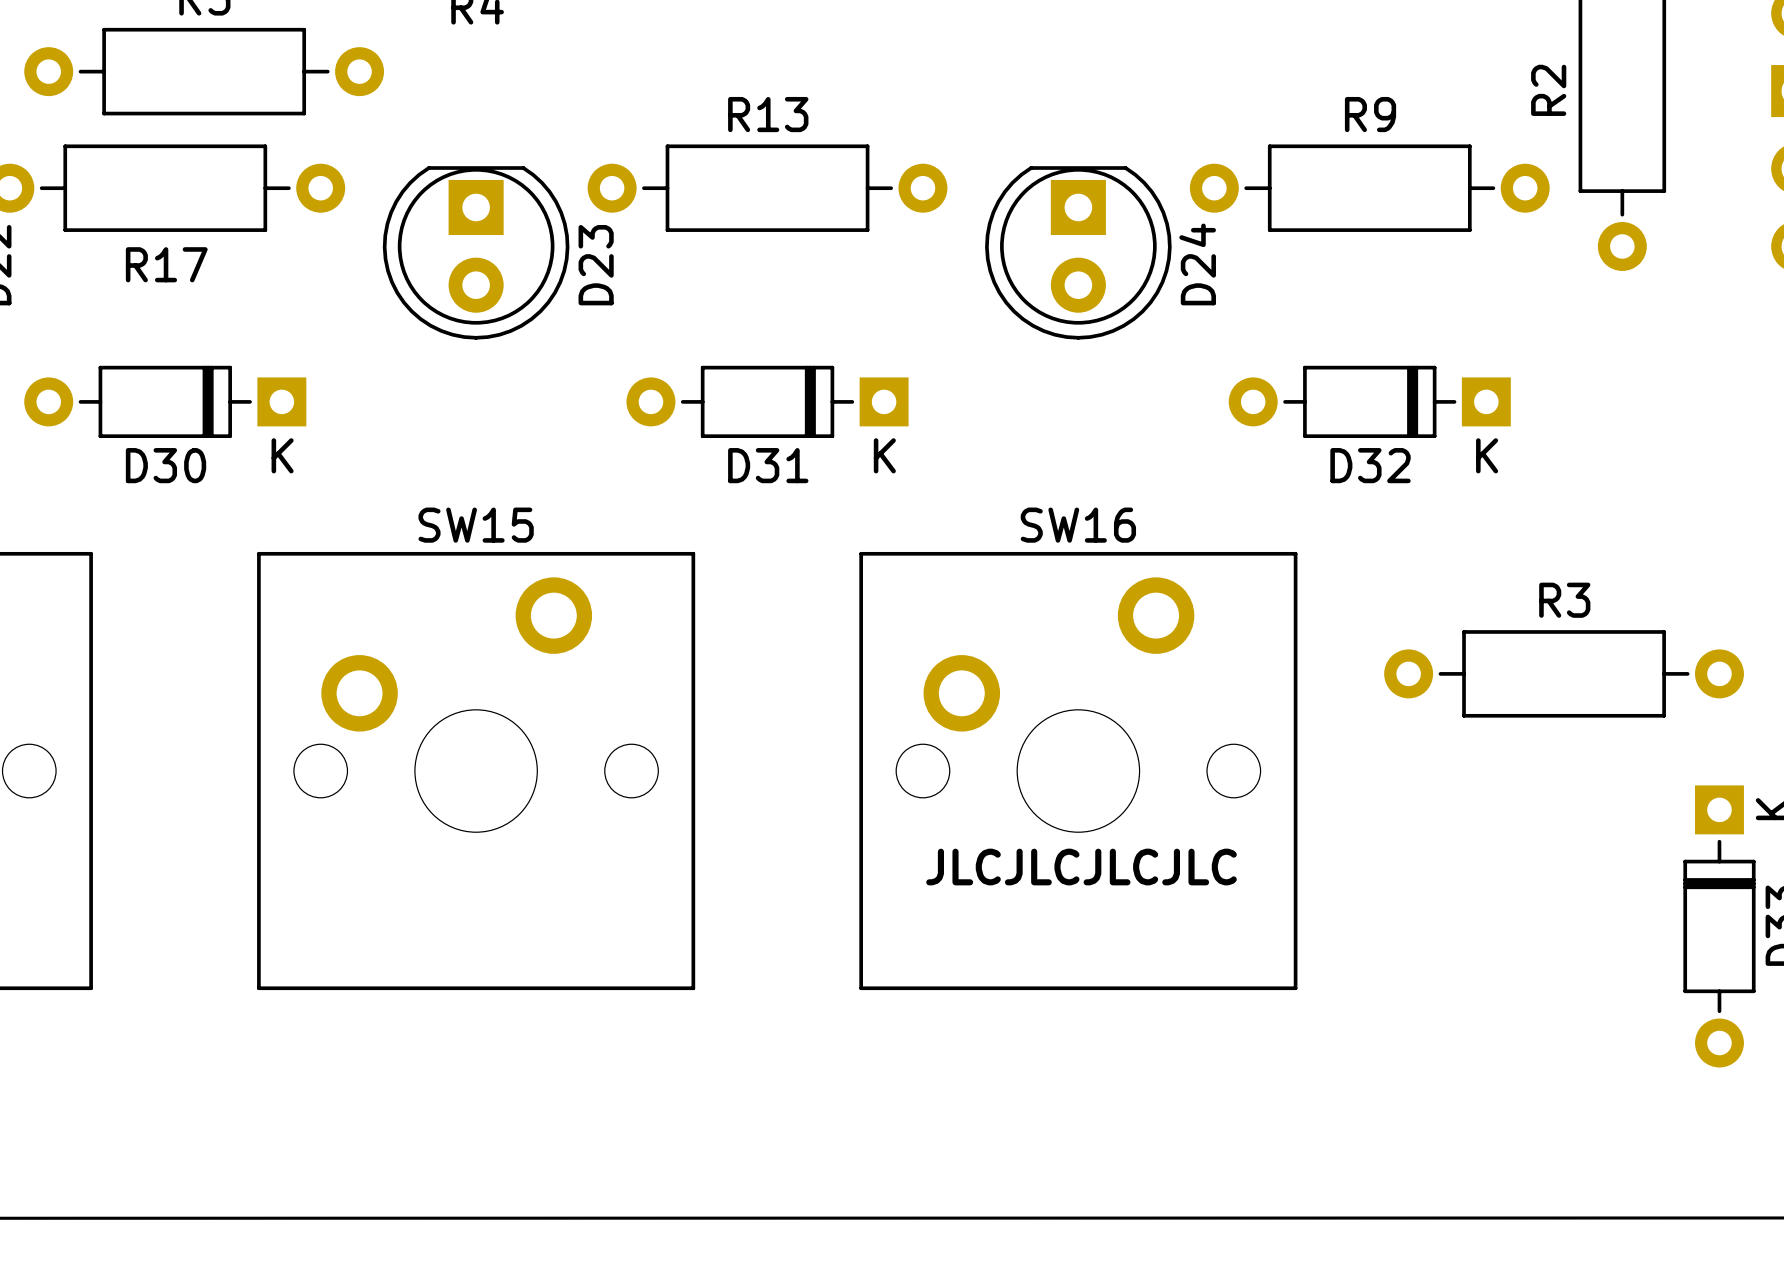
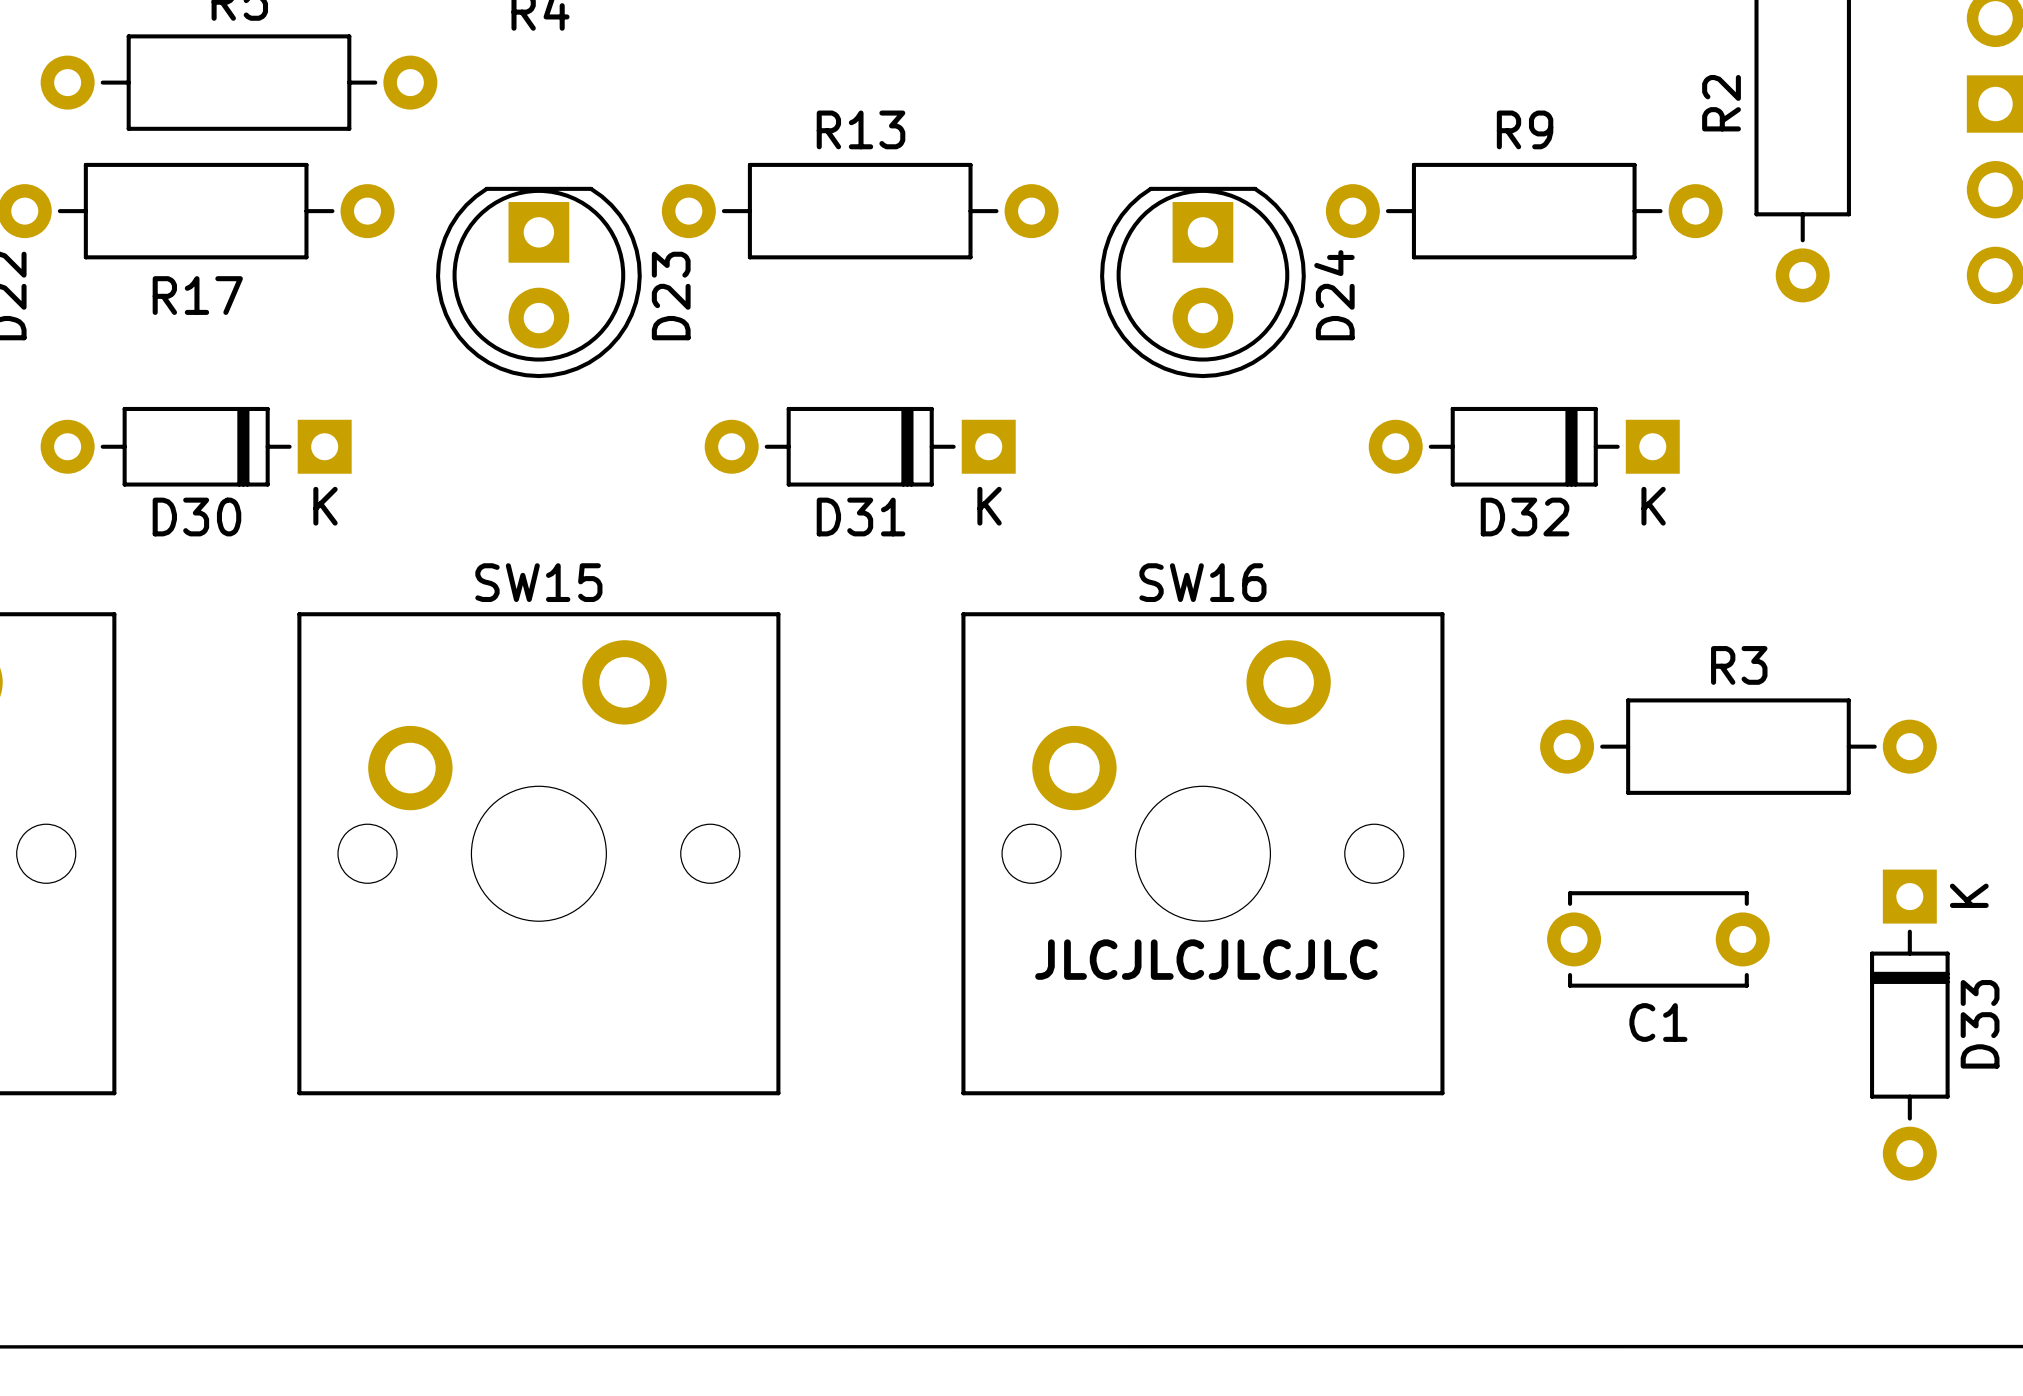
C1: none -> (1658, 939)

